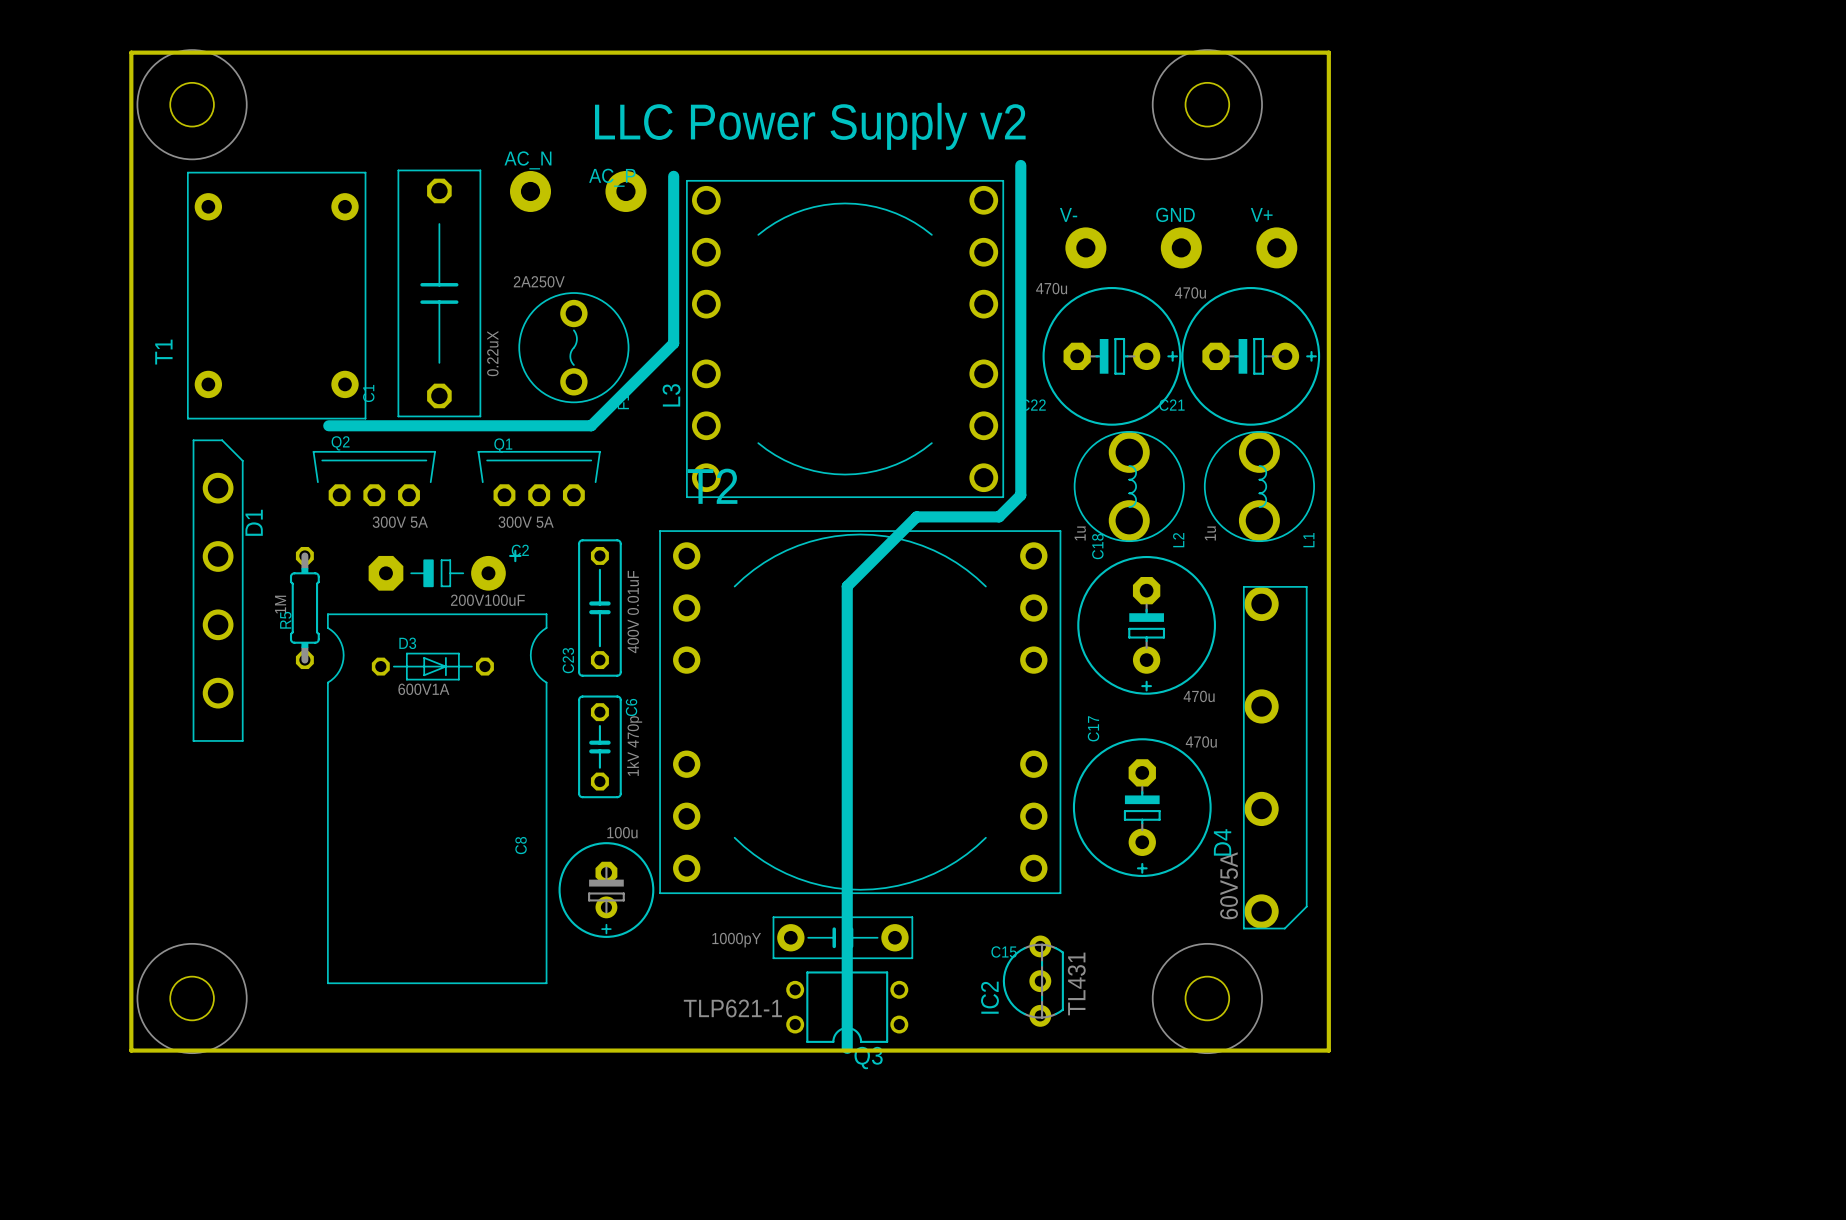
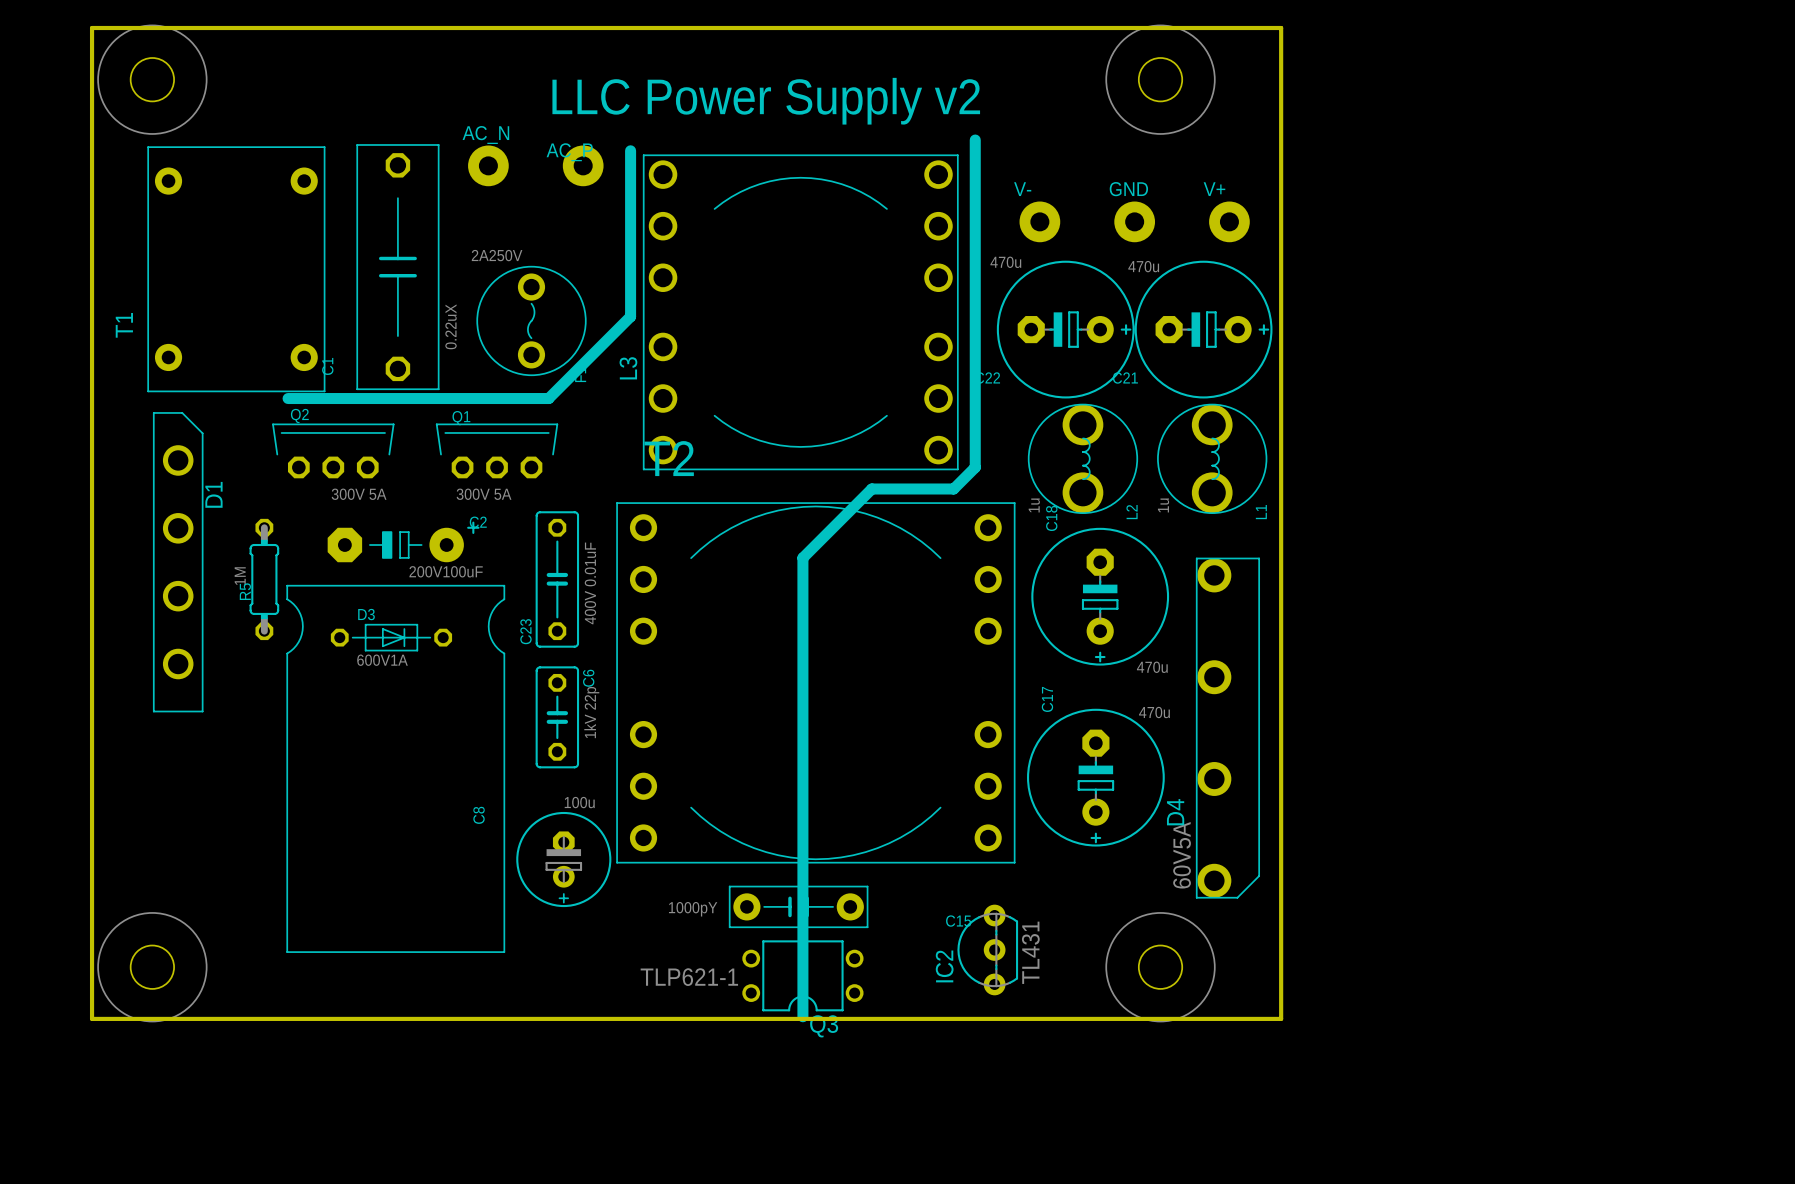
C6 value: 1kV 470p (634, 746) -> 1kV 22p (591, 712)

